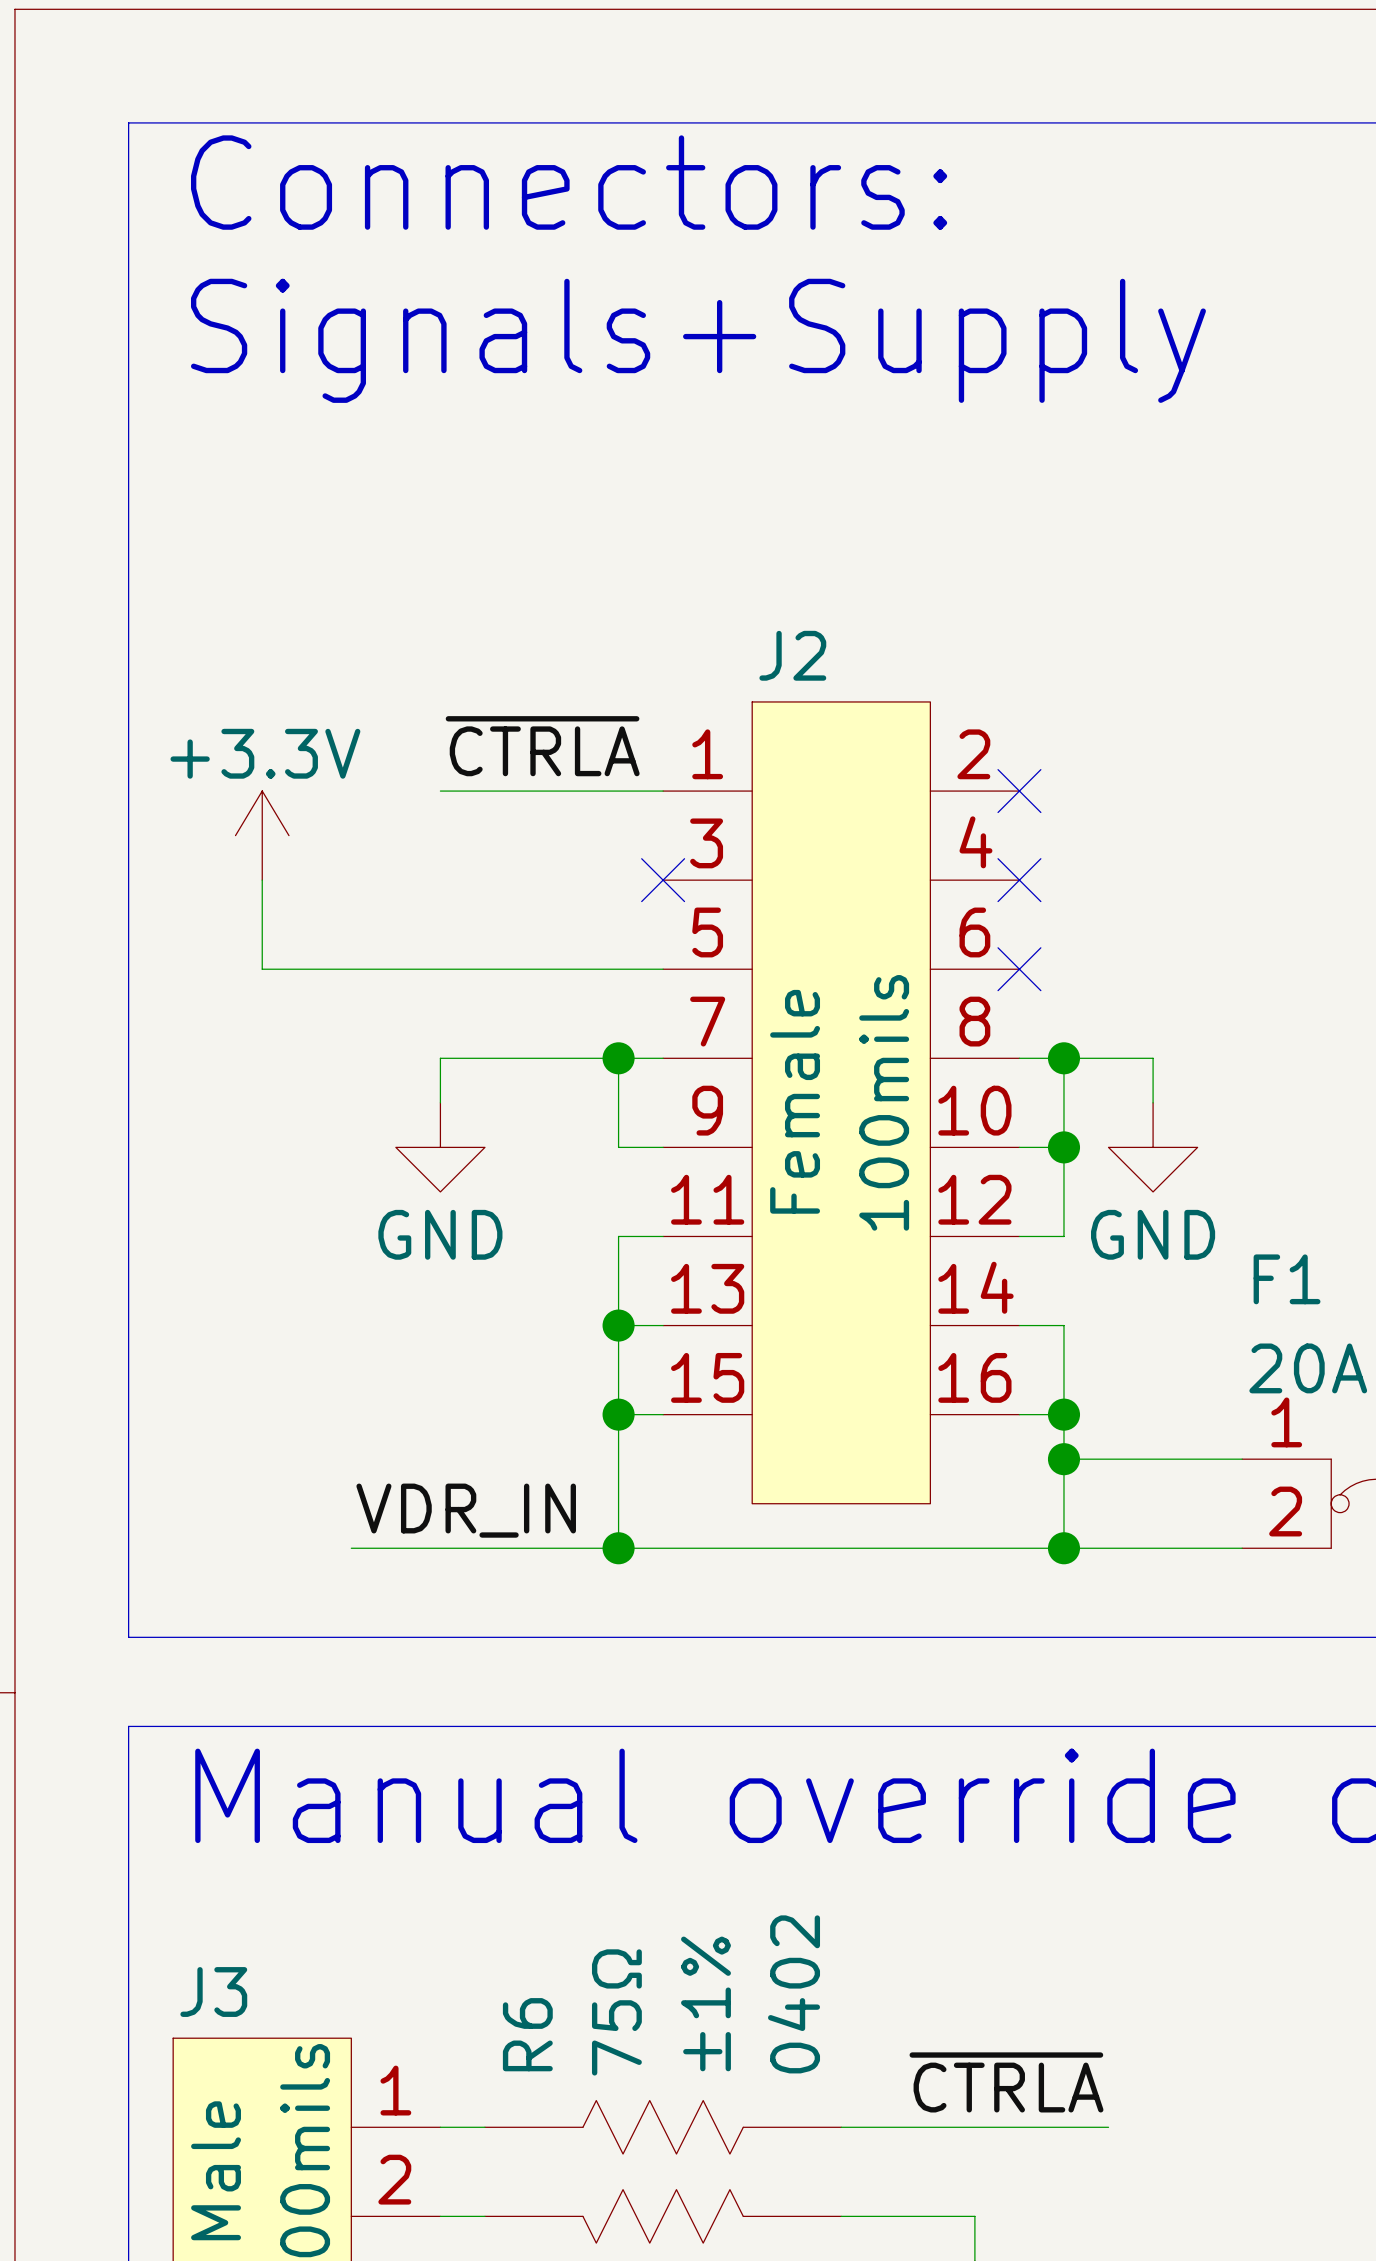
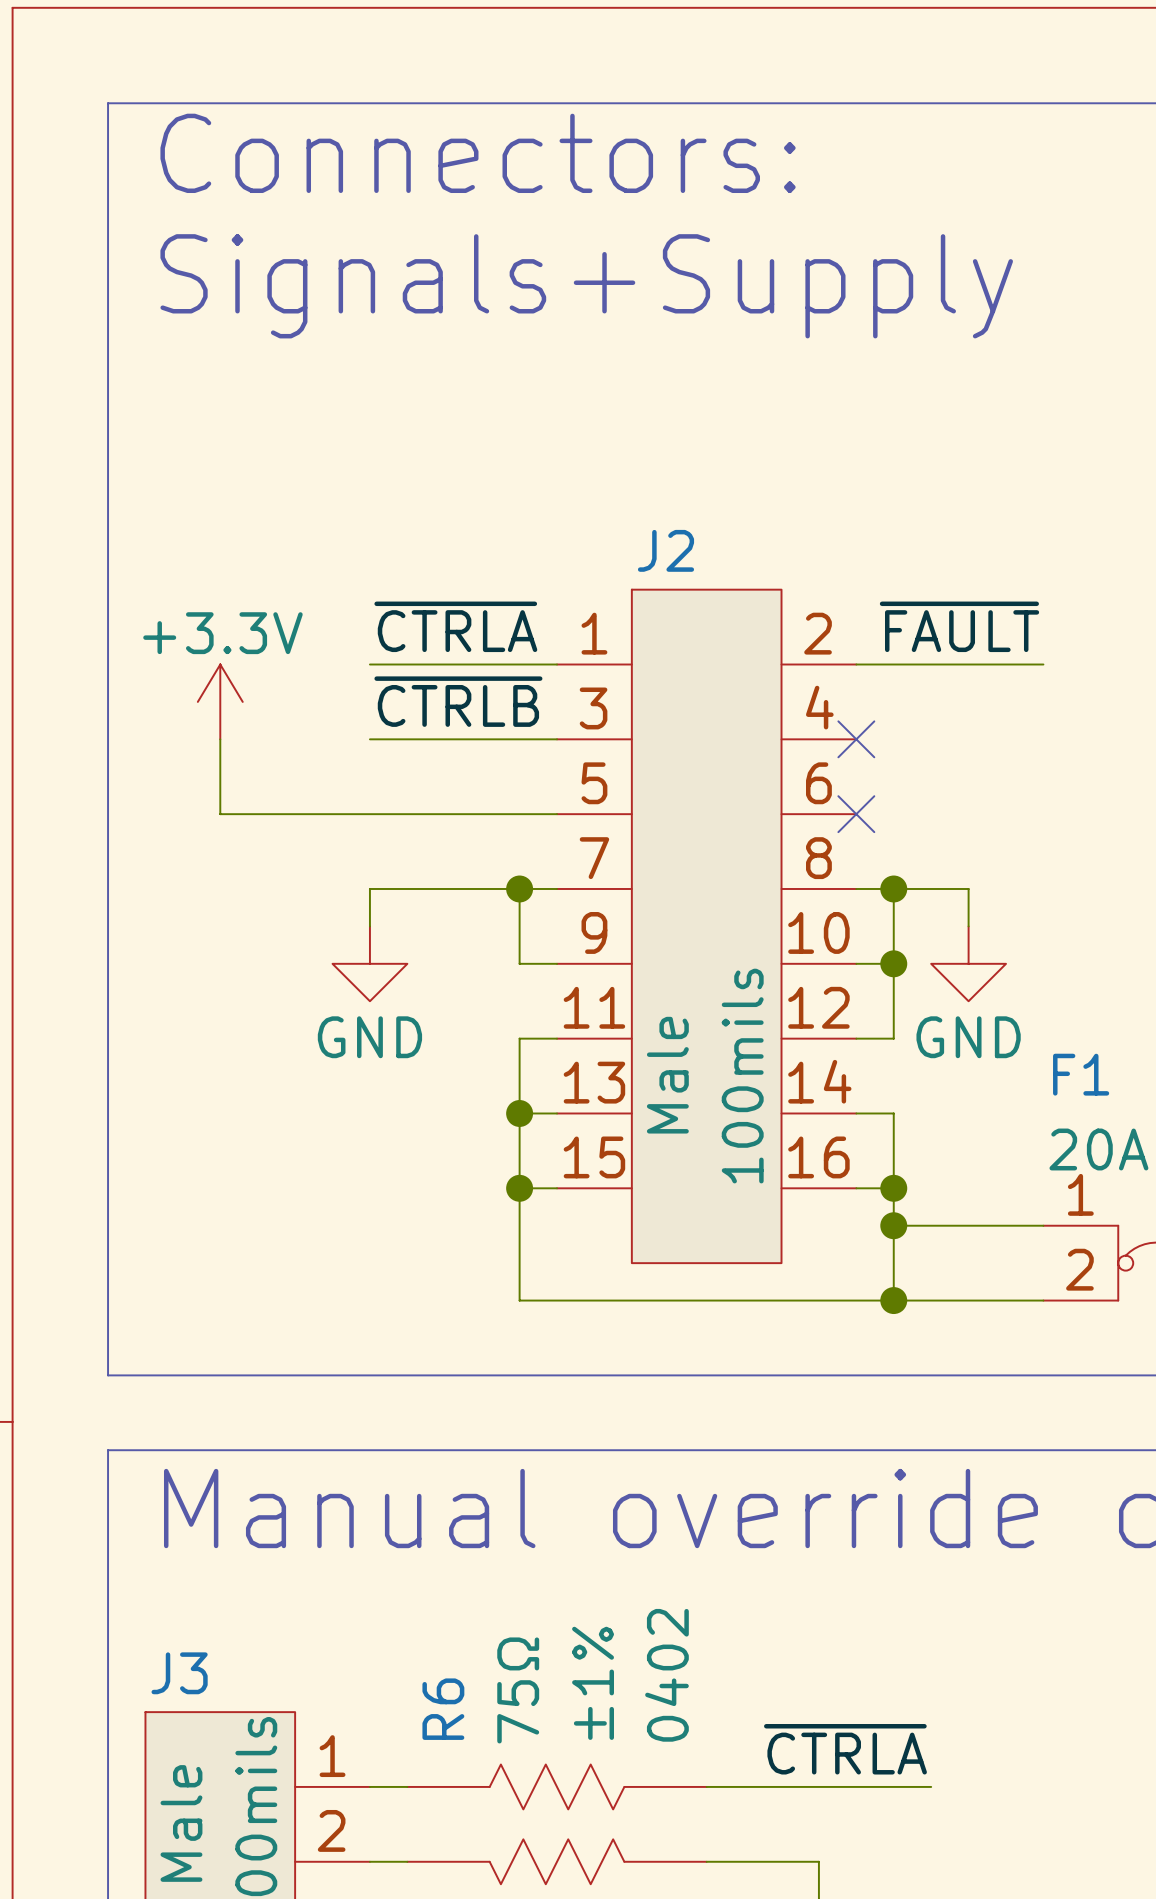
label: none -> ~{FAULT} (959, 626)
wire: none -> (856, 664) (1043, 664)
no-connect mark: (1019, 791) -> none
label: none -> ~{CTRLB} (458, 701)
wire: none -> (369, 739) (557, 739)
no-connect mark: (663, 880) -> none
J2 text: Female (795, 1101) -> Male (667, 1075)
J2 text position: 100mils (884, 1102) -> 100mils (742, 1076)
label: VDR_IN (466, 1510) -> none
wire: (351, 1548) (618, 1548) -> none
junction: (618, 1548) -> none

